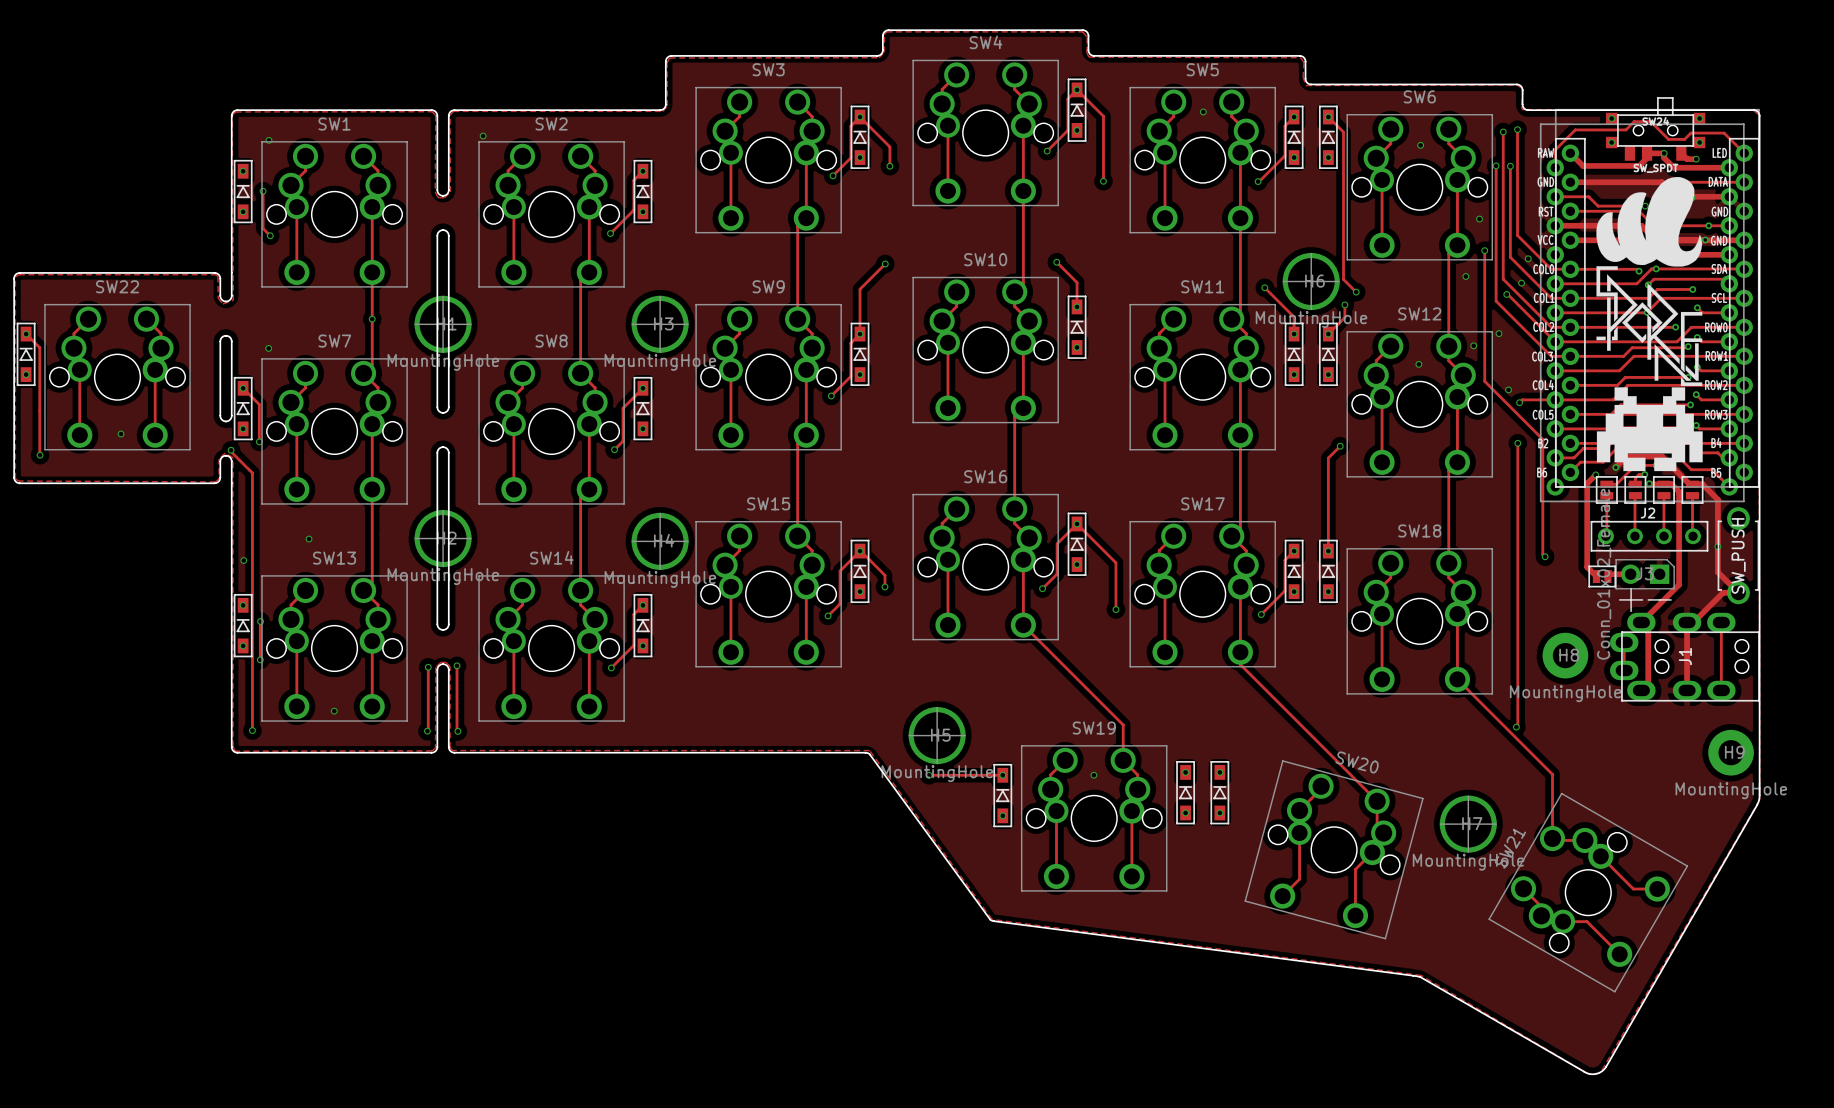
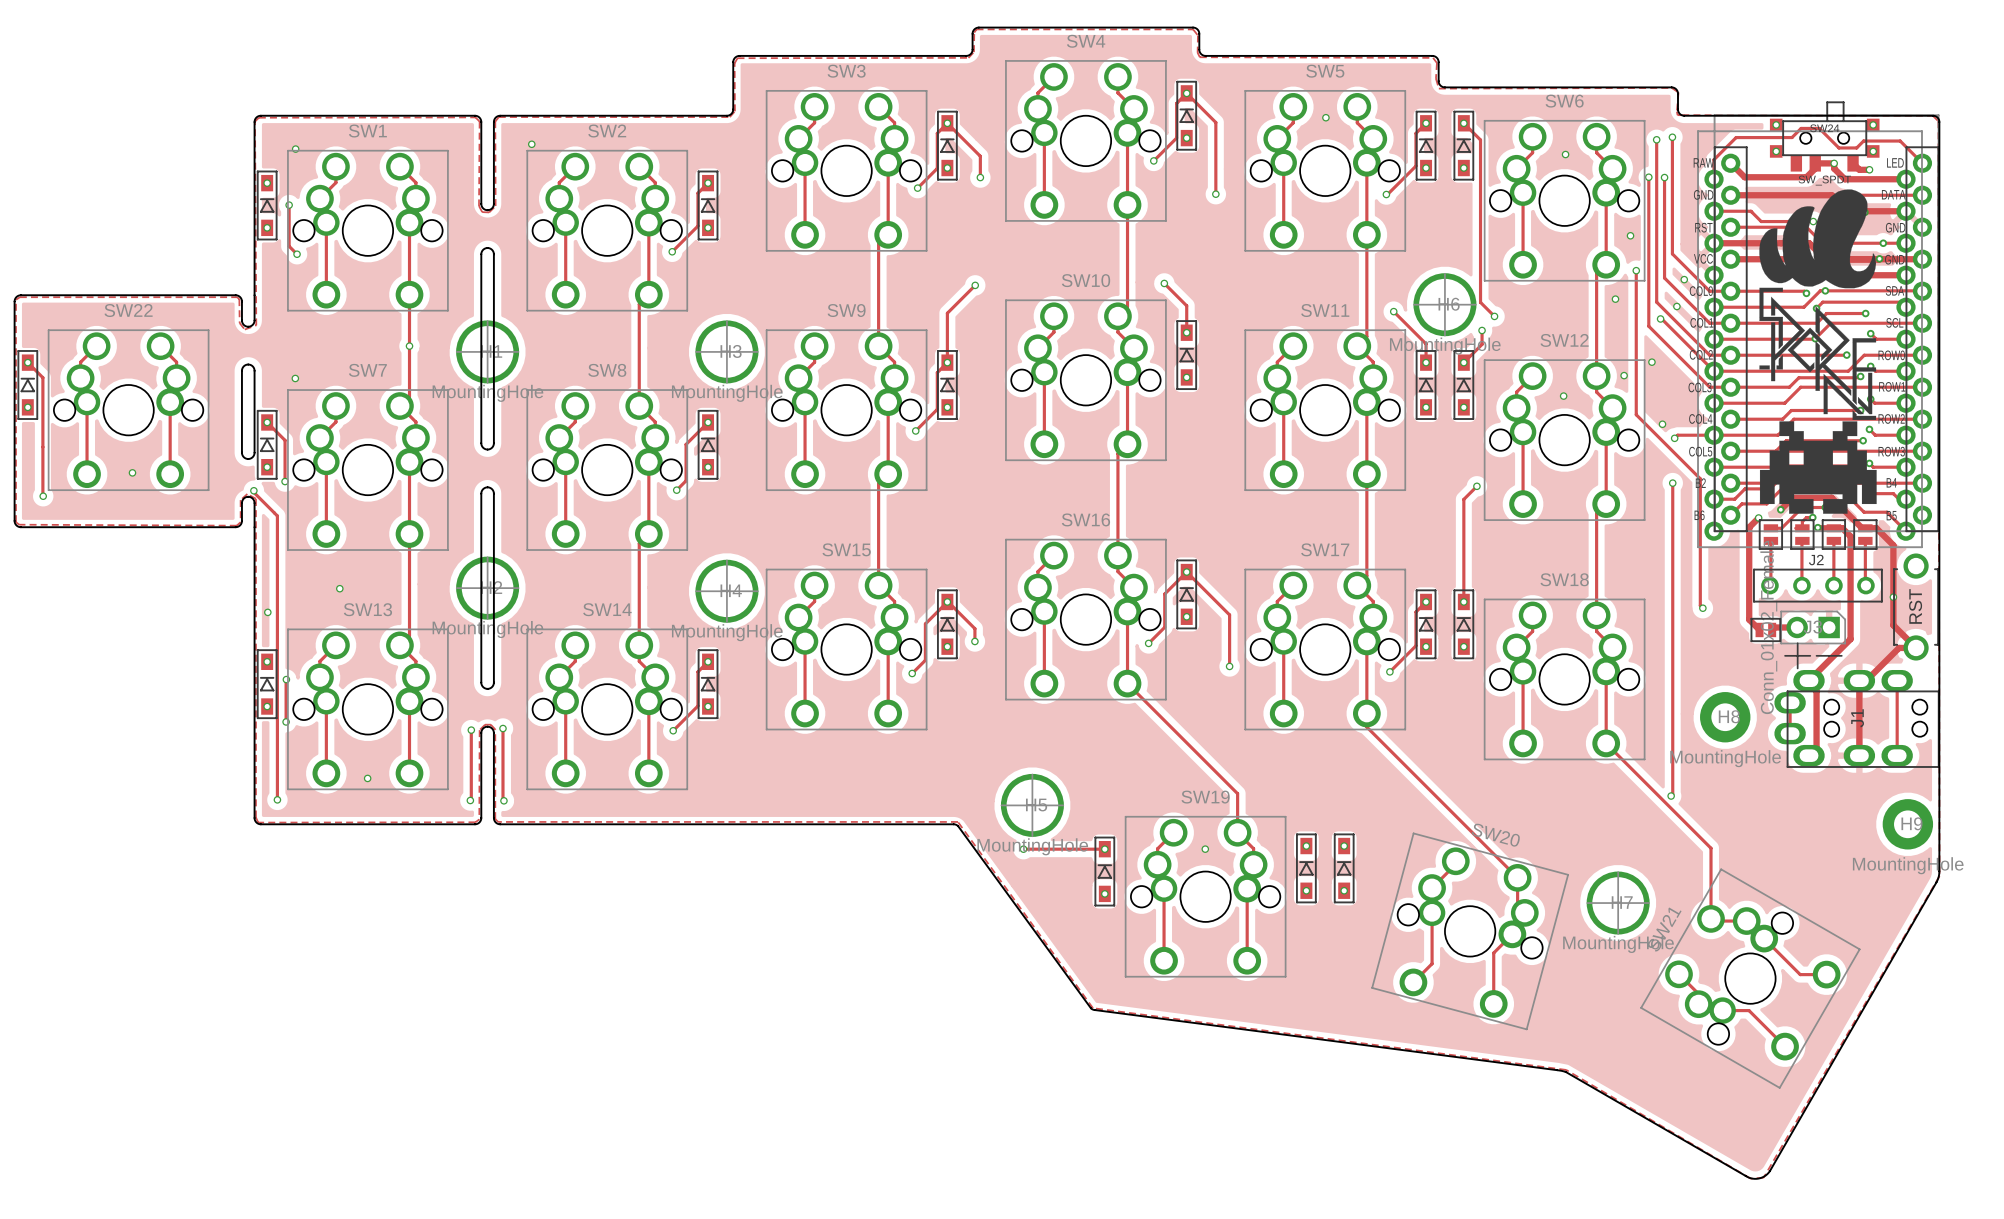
part value: SW_PUSH (1738, 555) -> RST (1915, 606)

